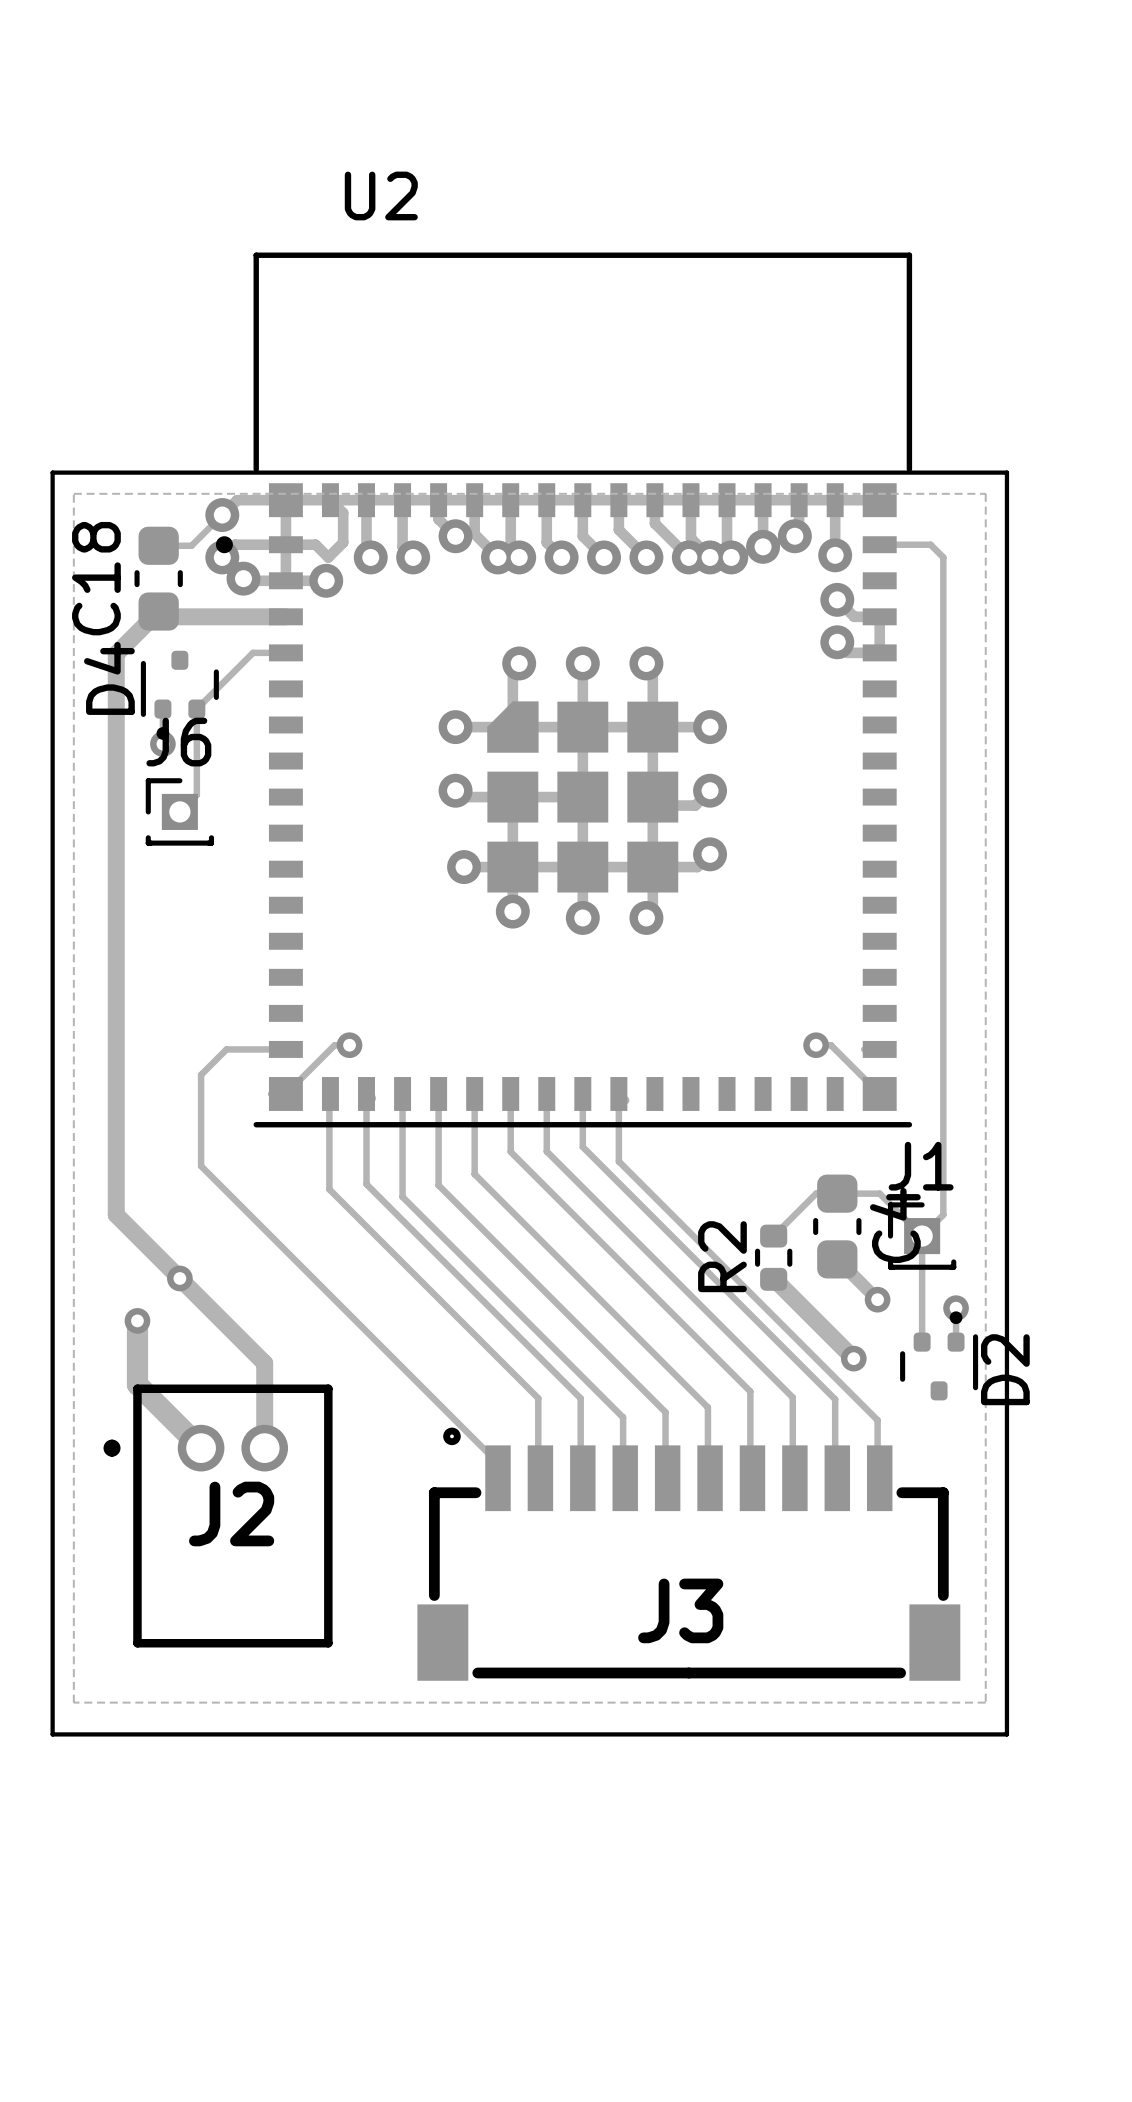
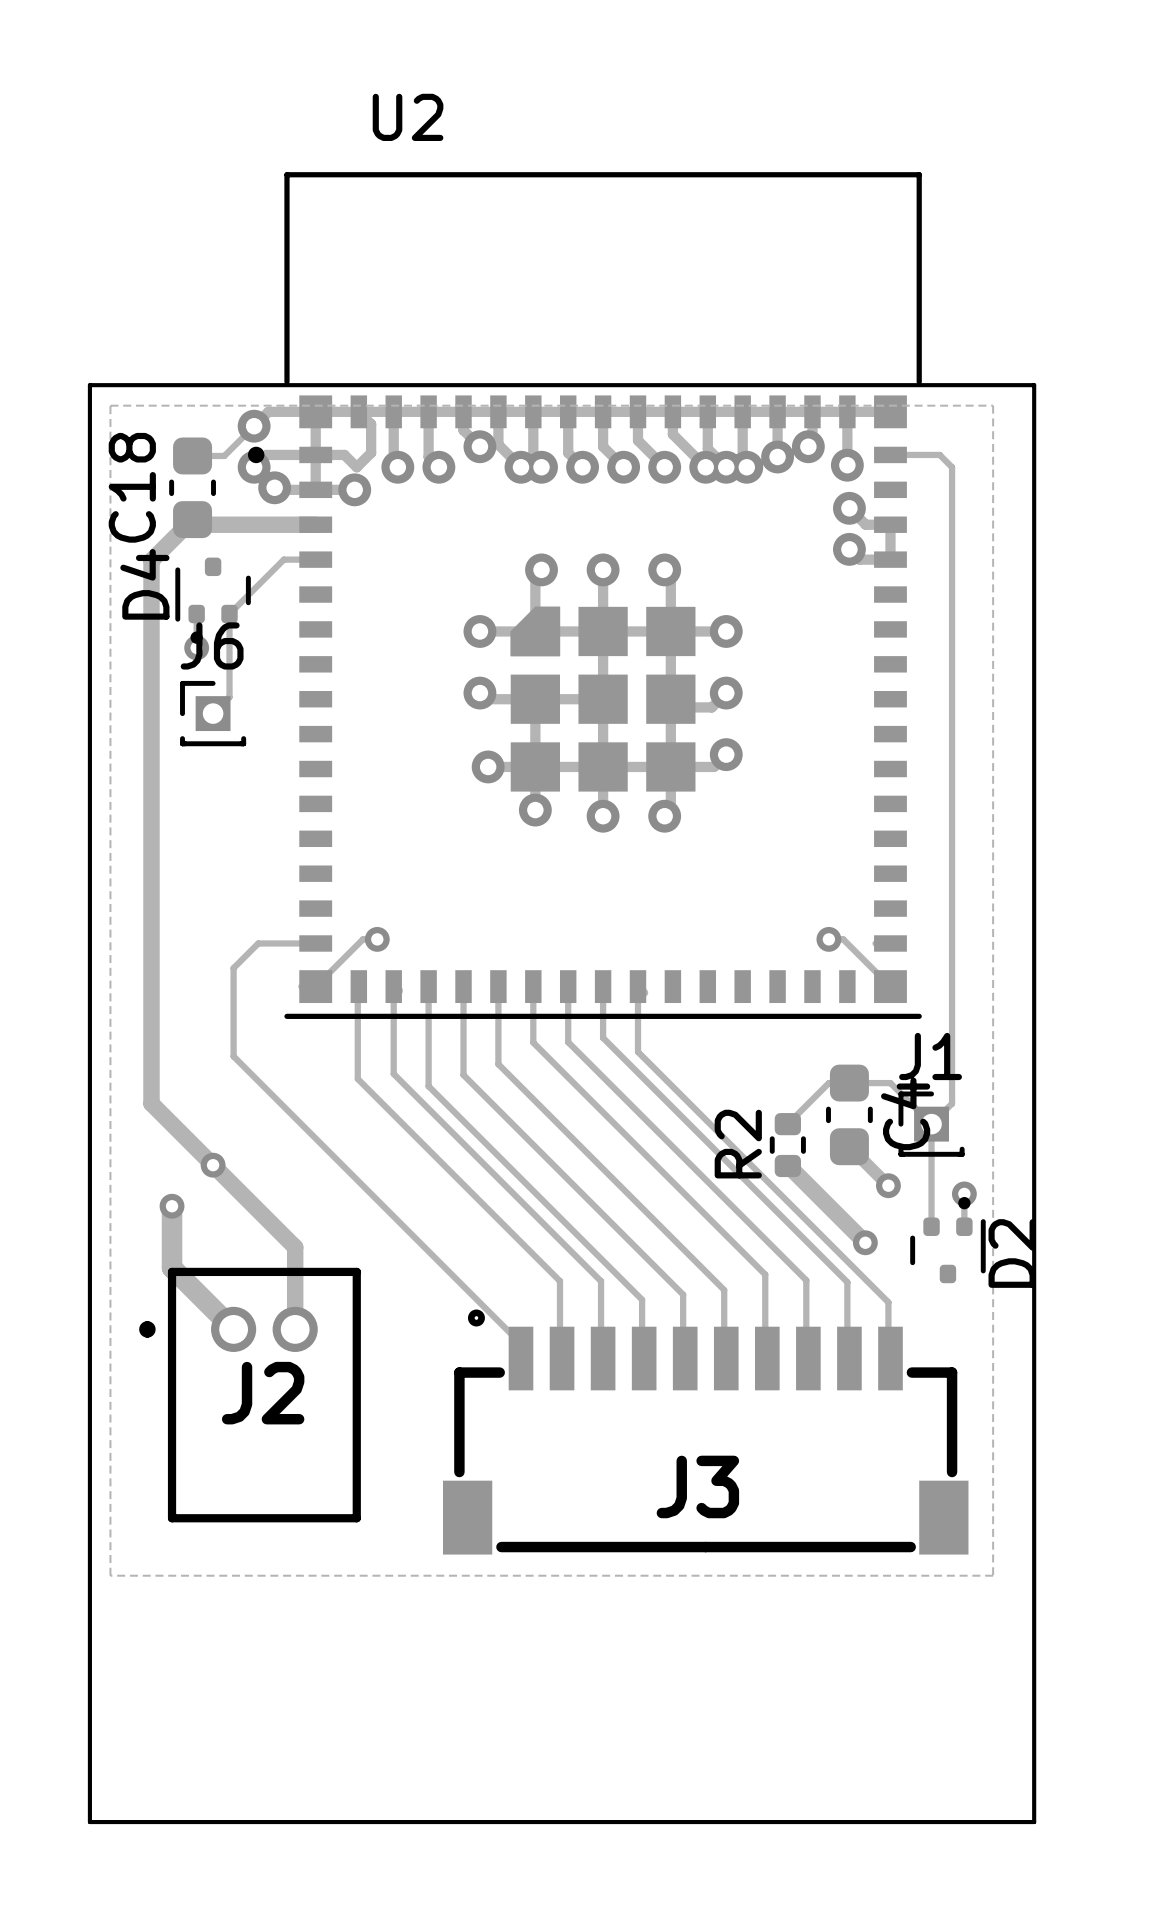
board edge: (1006, 472) (1006, 1734) (52, 1734) -> (1013, 385) (1034, 385) (1034, 1822) (89, 1822) (89, 1606)

